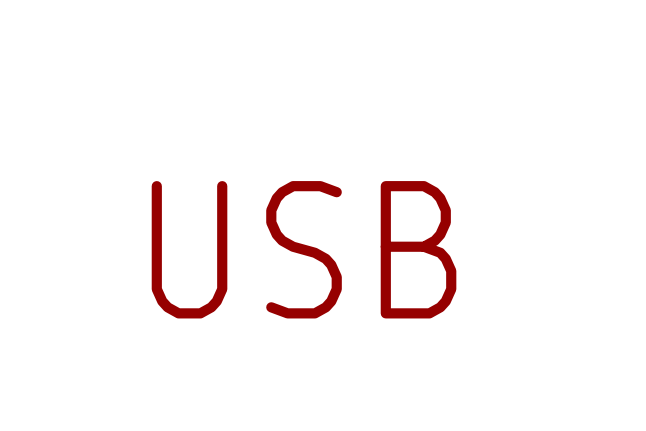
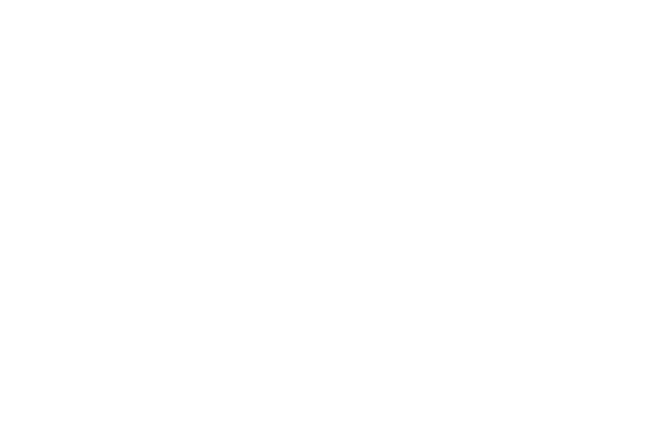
text: USB (304, 249) -> none

